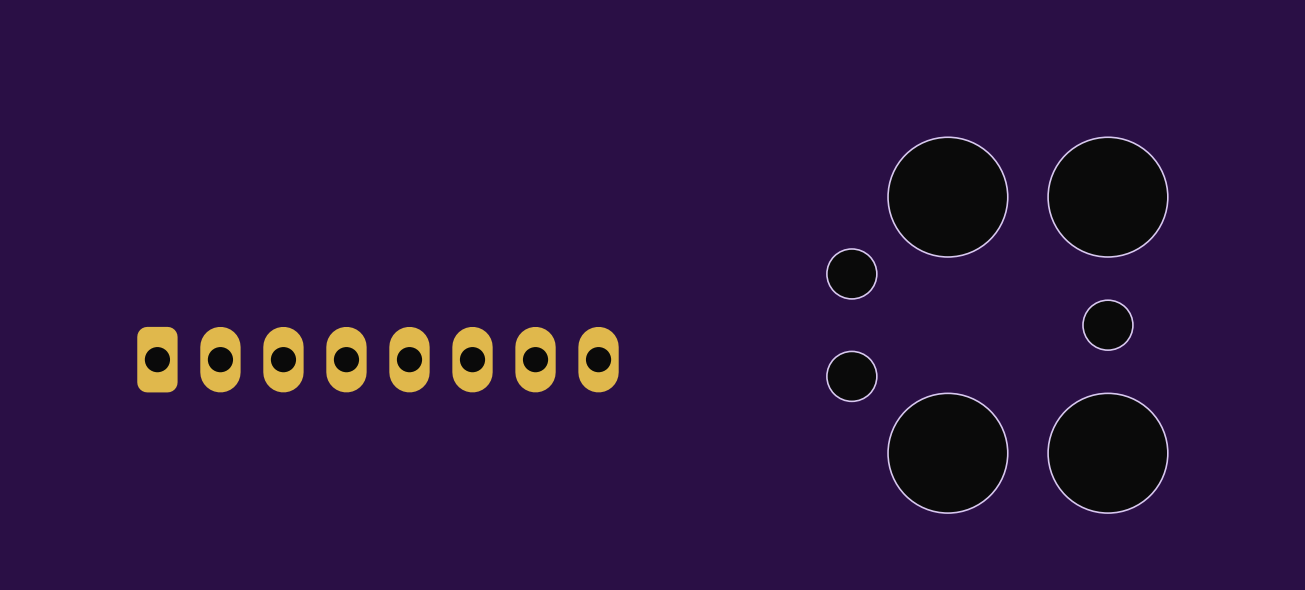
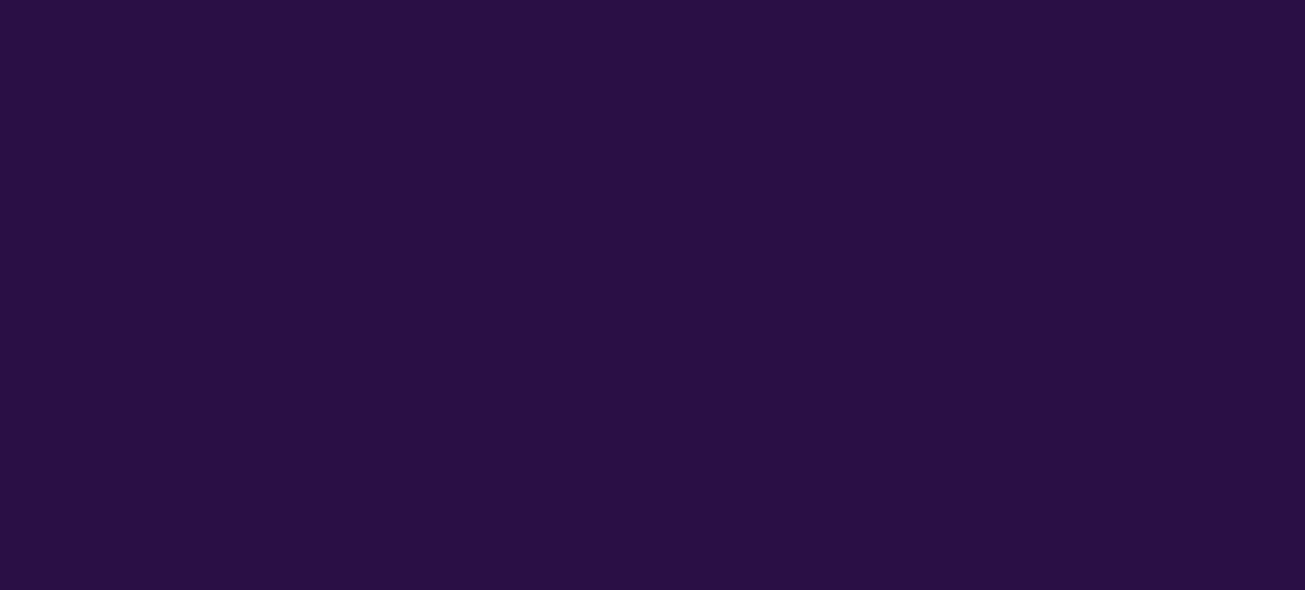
part: (997, 325) -> none
part: (377, 359) -> none

